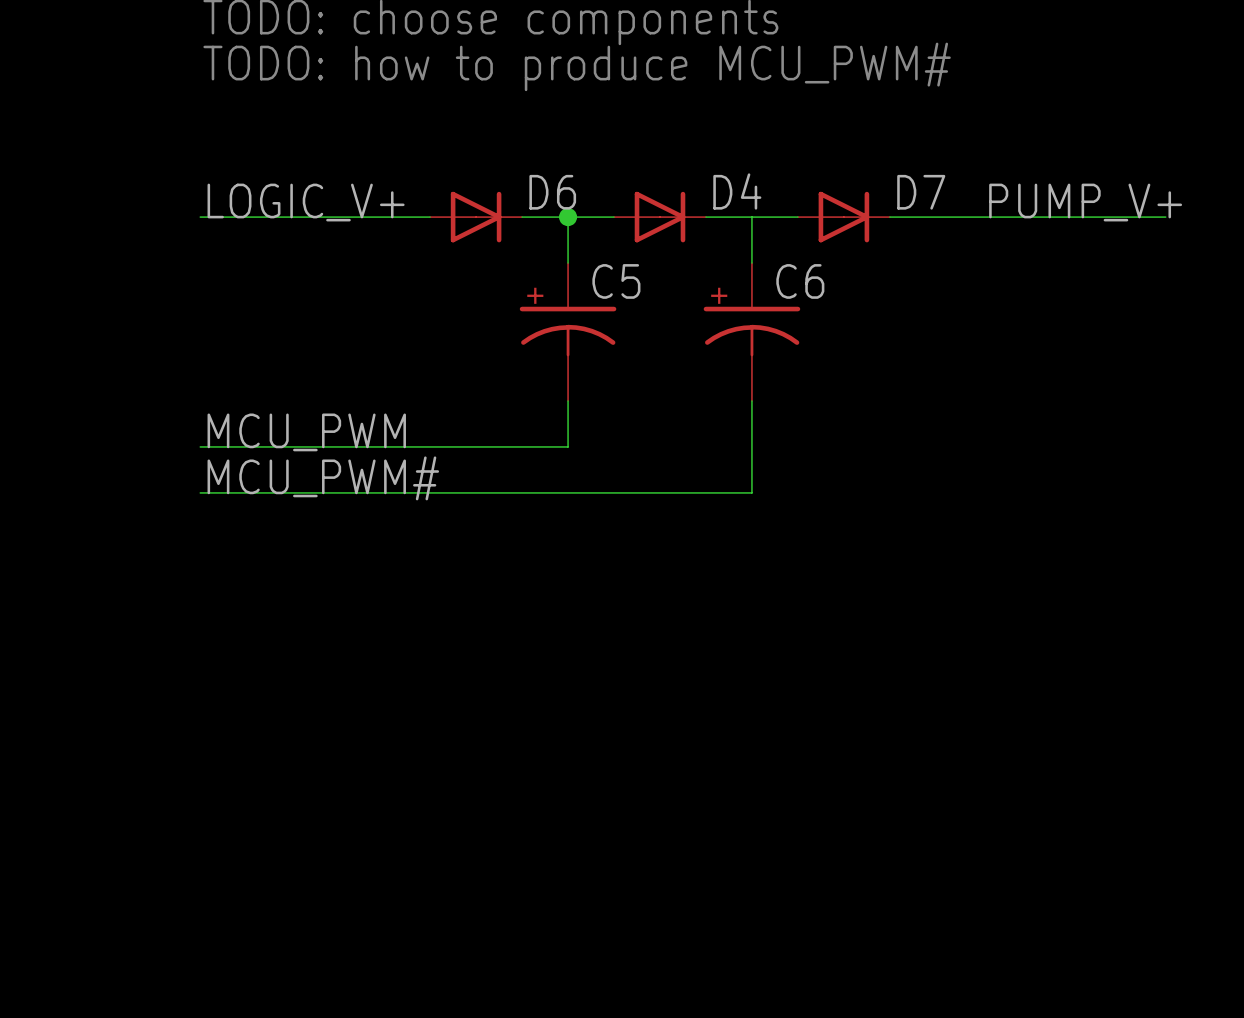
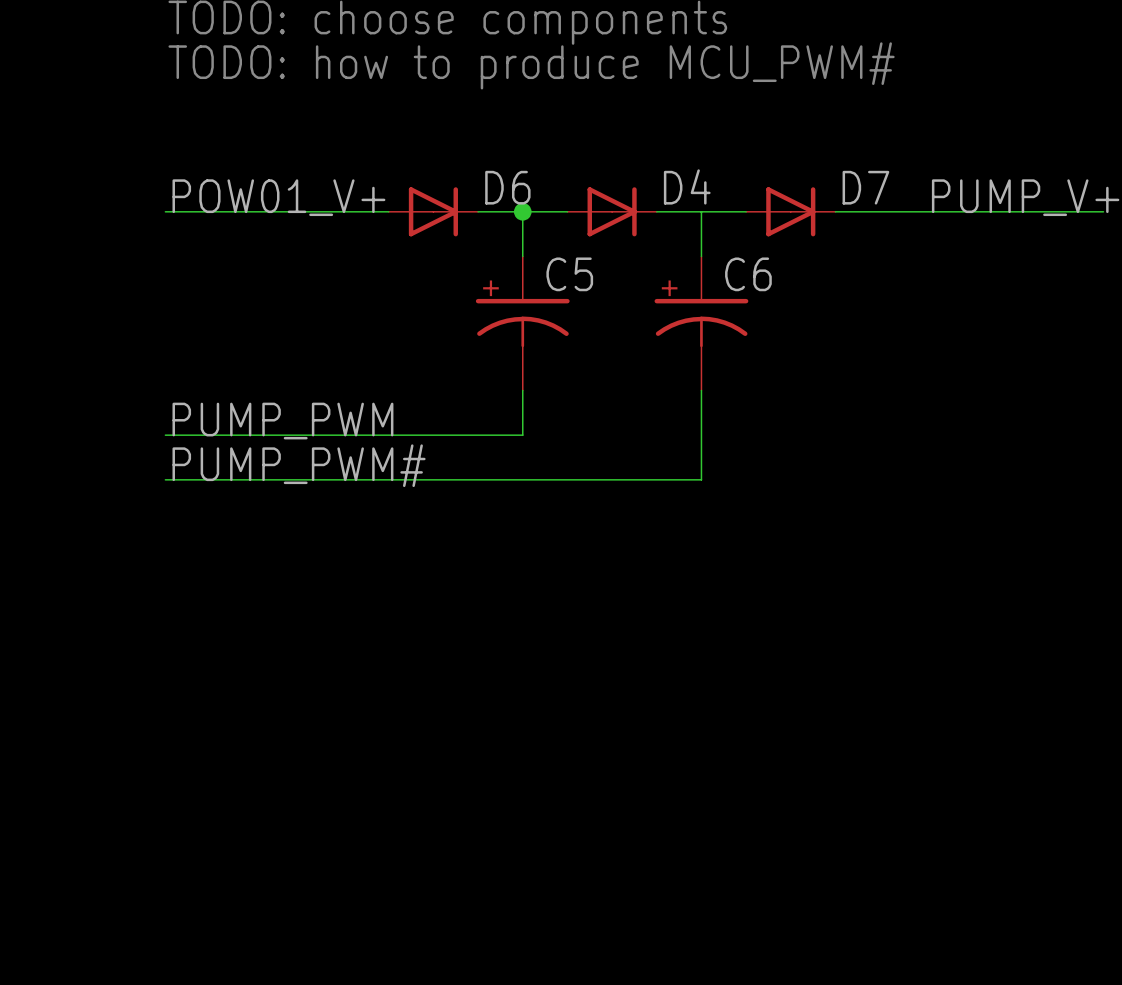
label: LOGIC_V+ (306, 202) -> POW01_V+ (278, 197)
label: MCU_PWM (306, 432) -> PUMP_PWM (282, 421)
label: MCU_PWM# (323, 478) -> PUMP_PWM# (299, 465)

